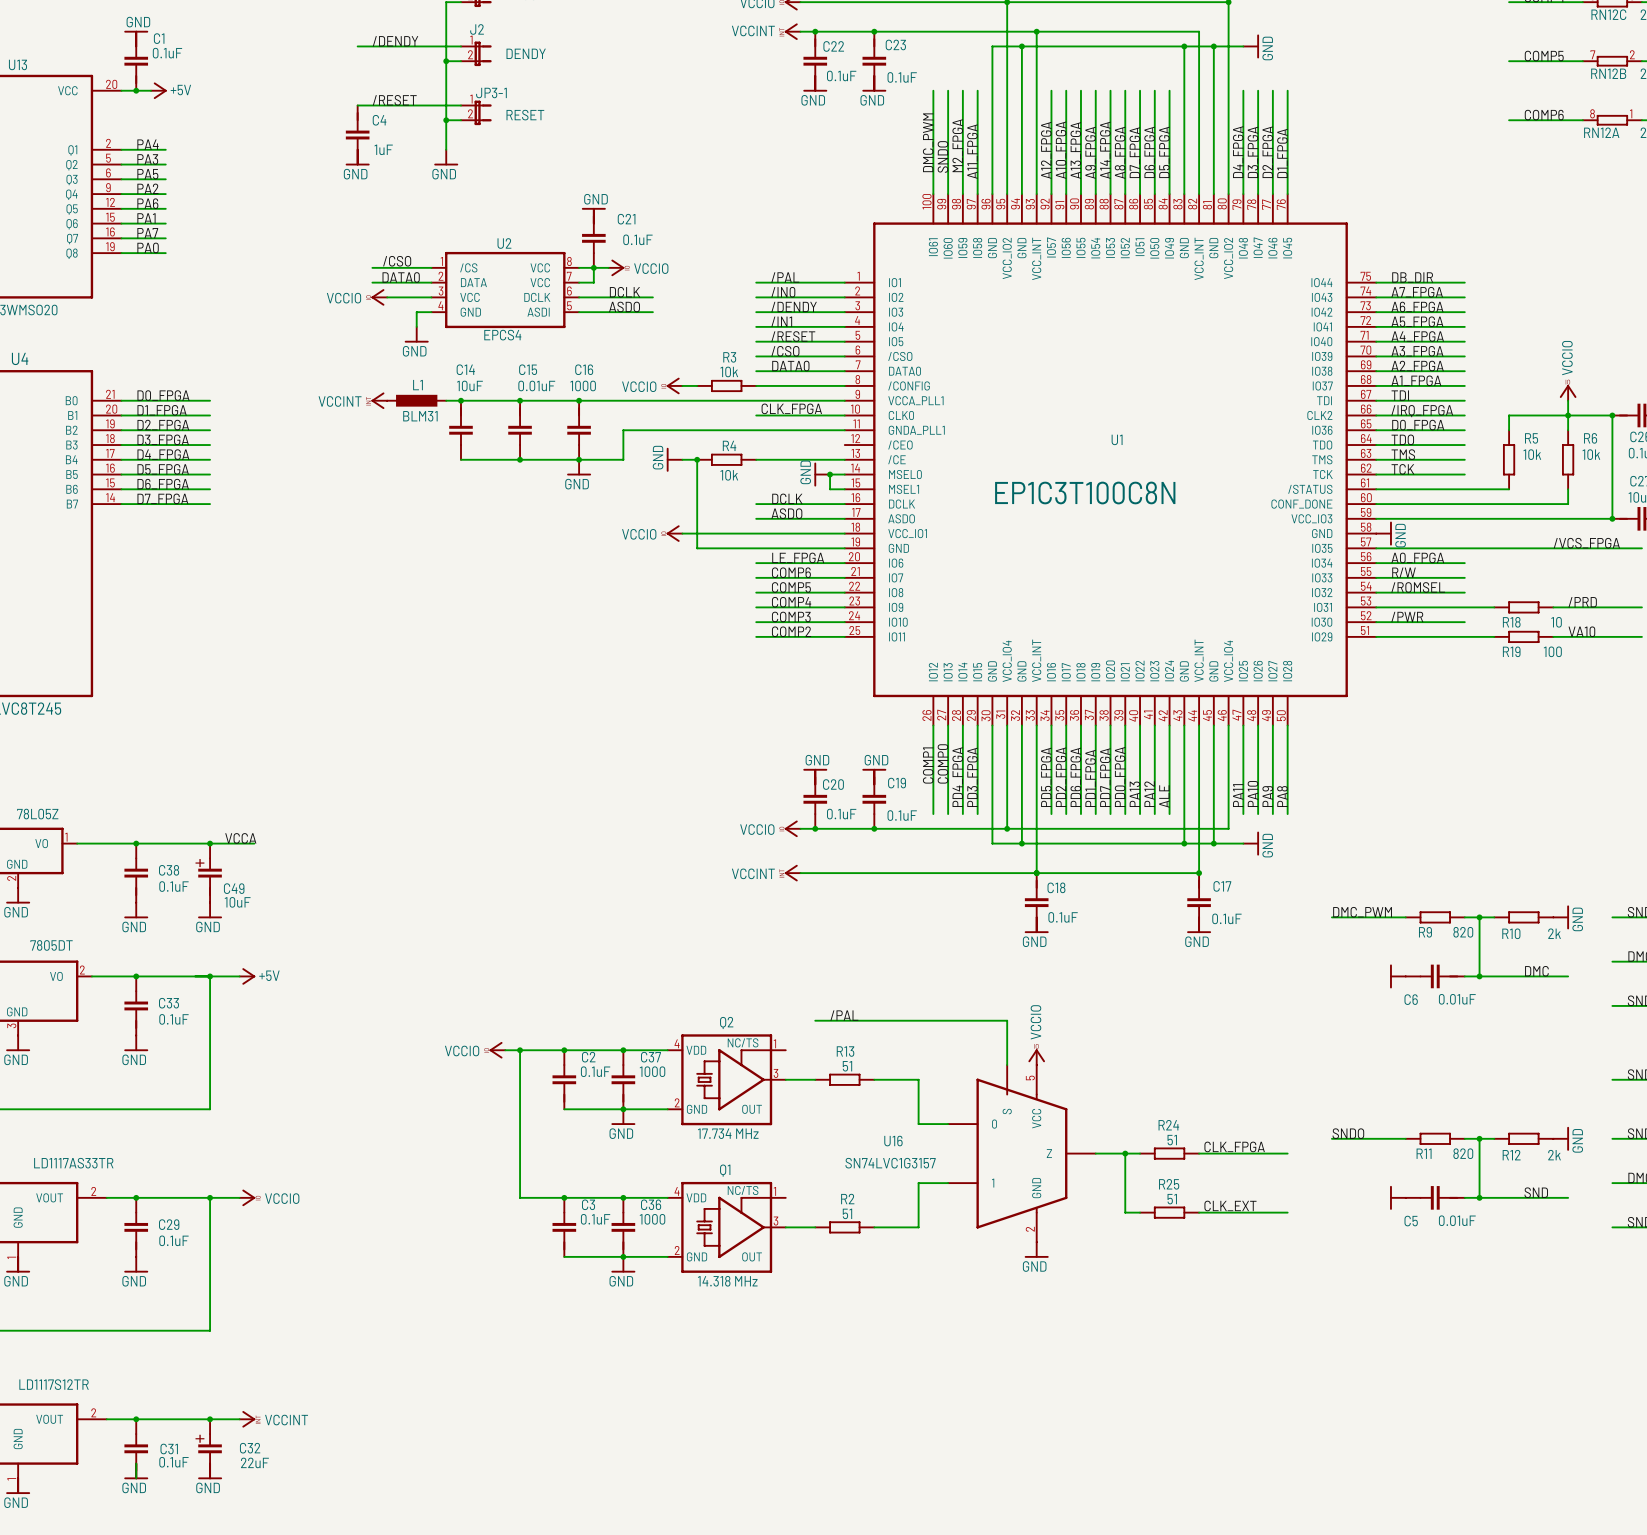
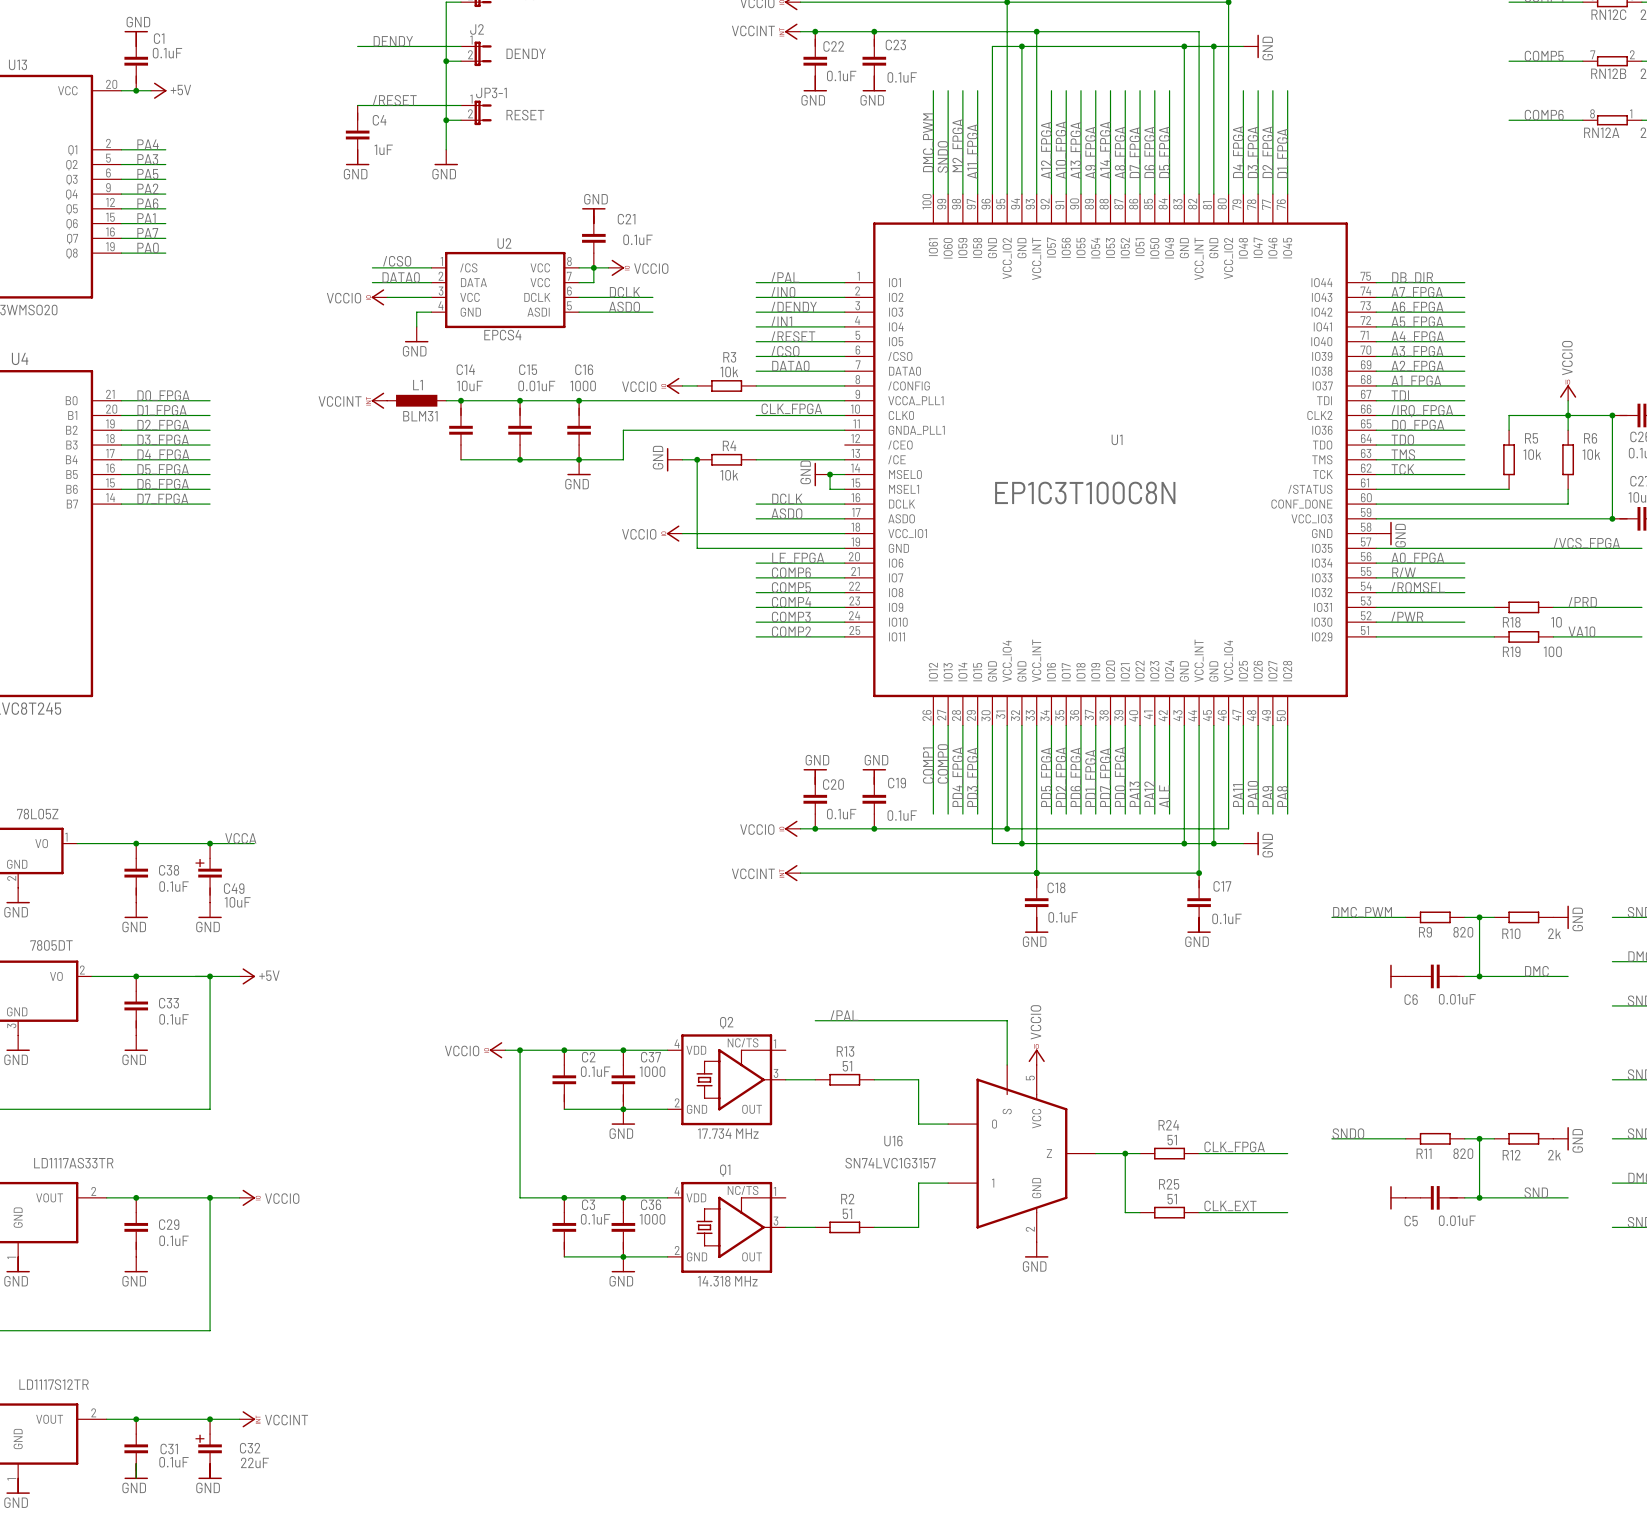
label: /DENDY (395, 41) -> DENDY (393, 41)

